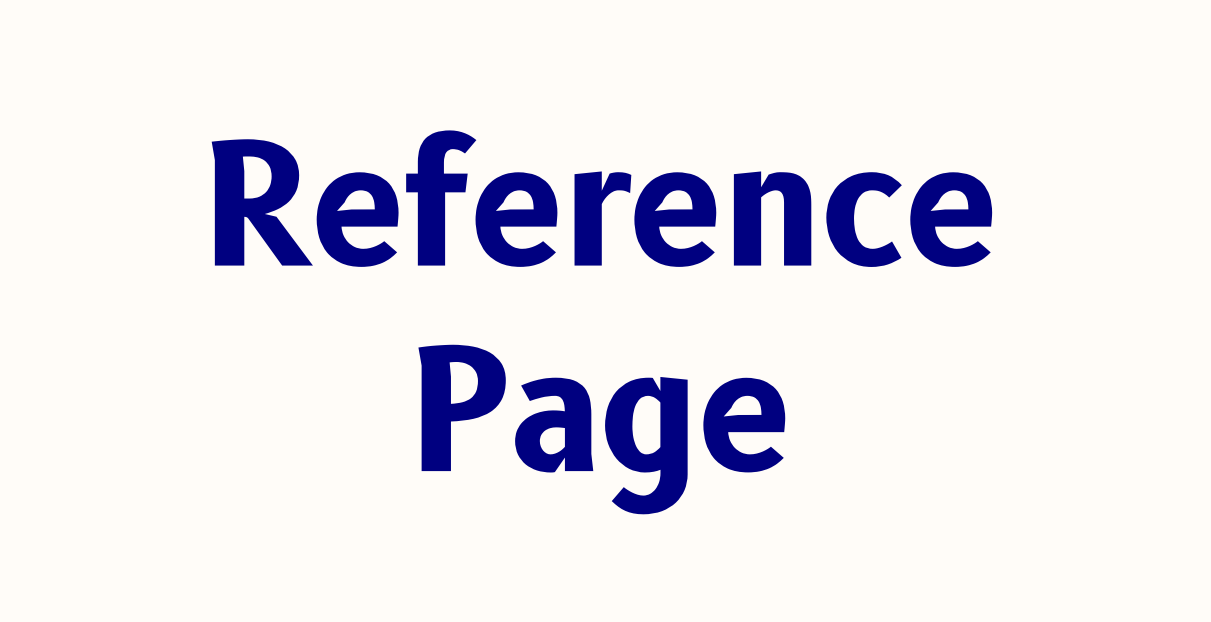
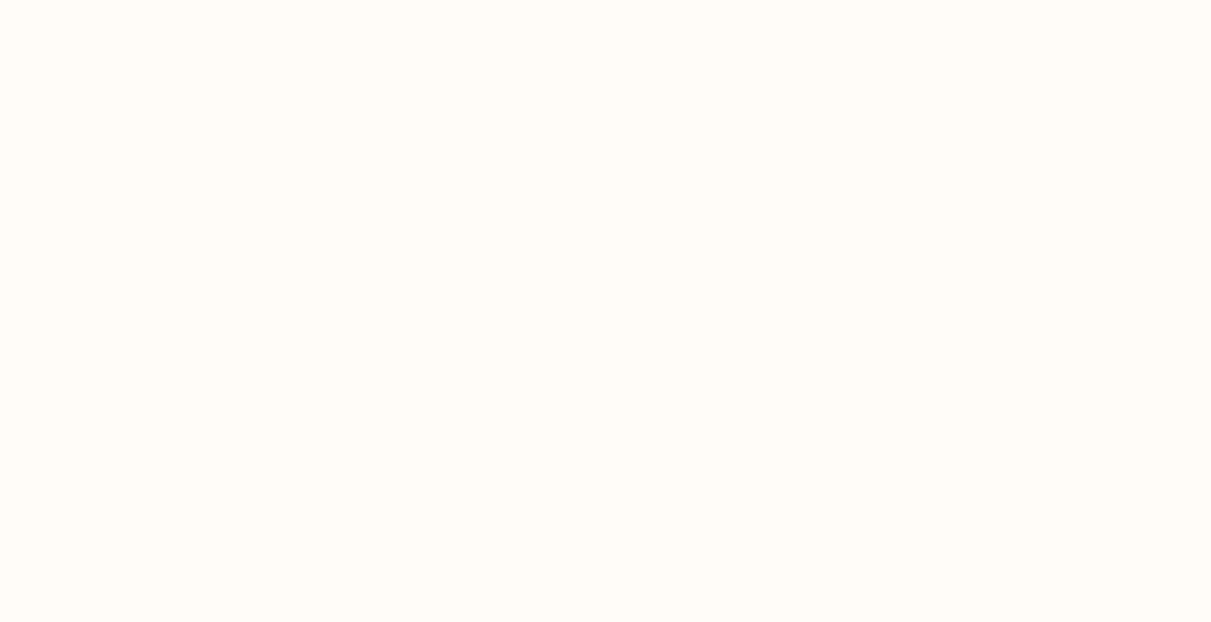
text: Reference (601, 198) -> none
text: Page (601, 429) -> none

